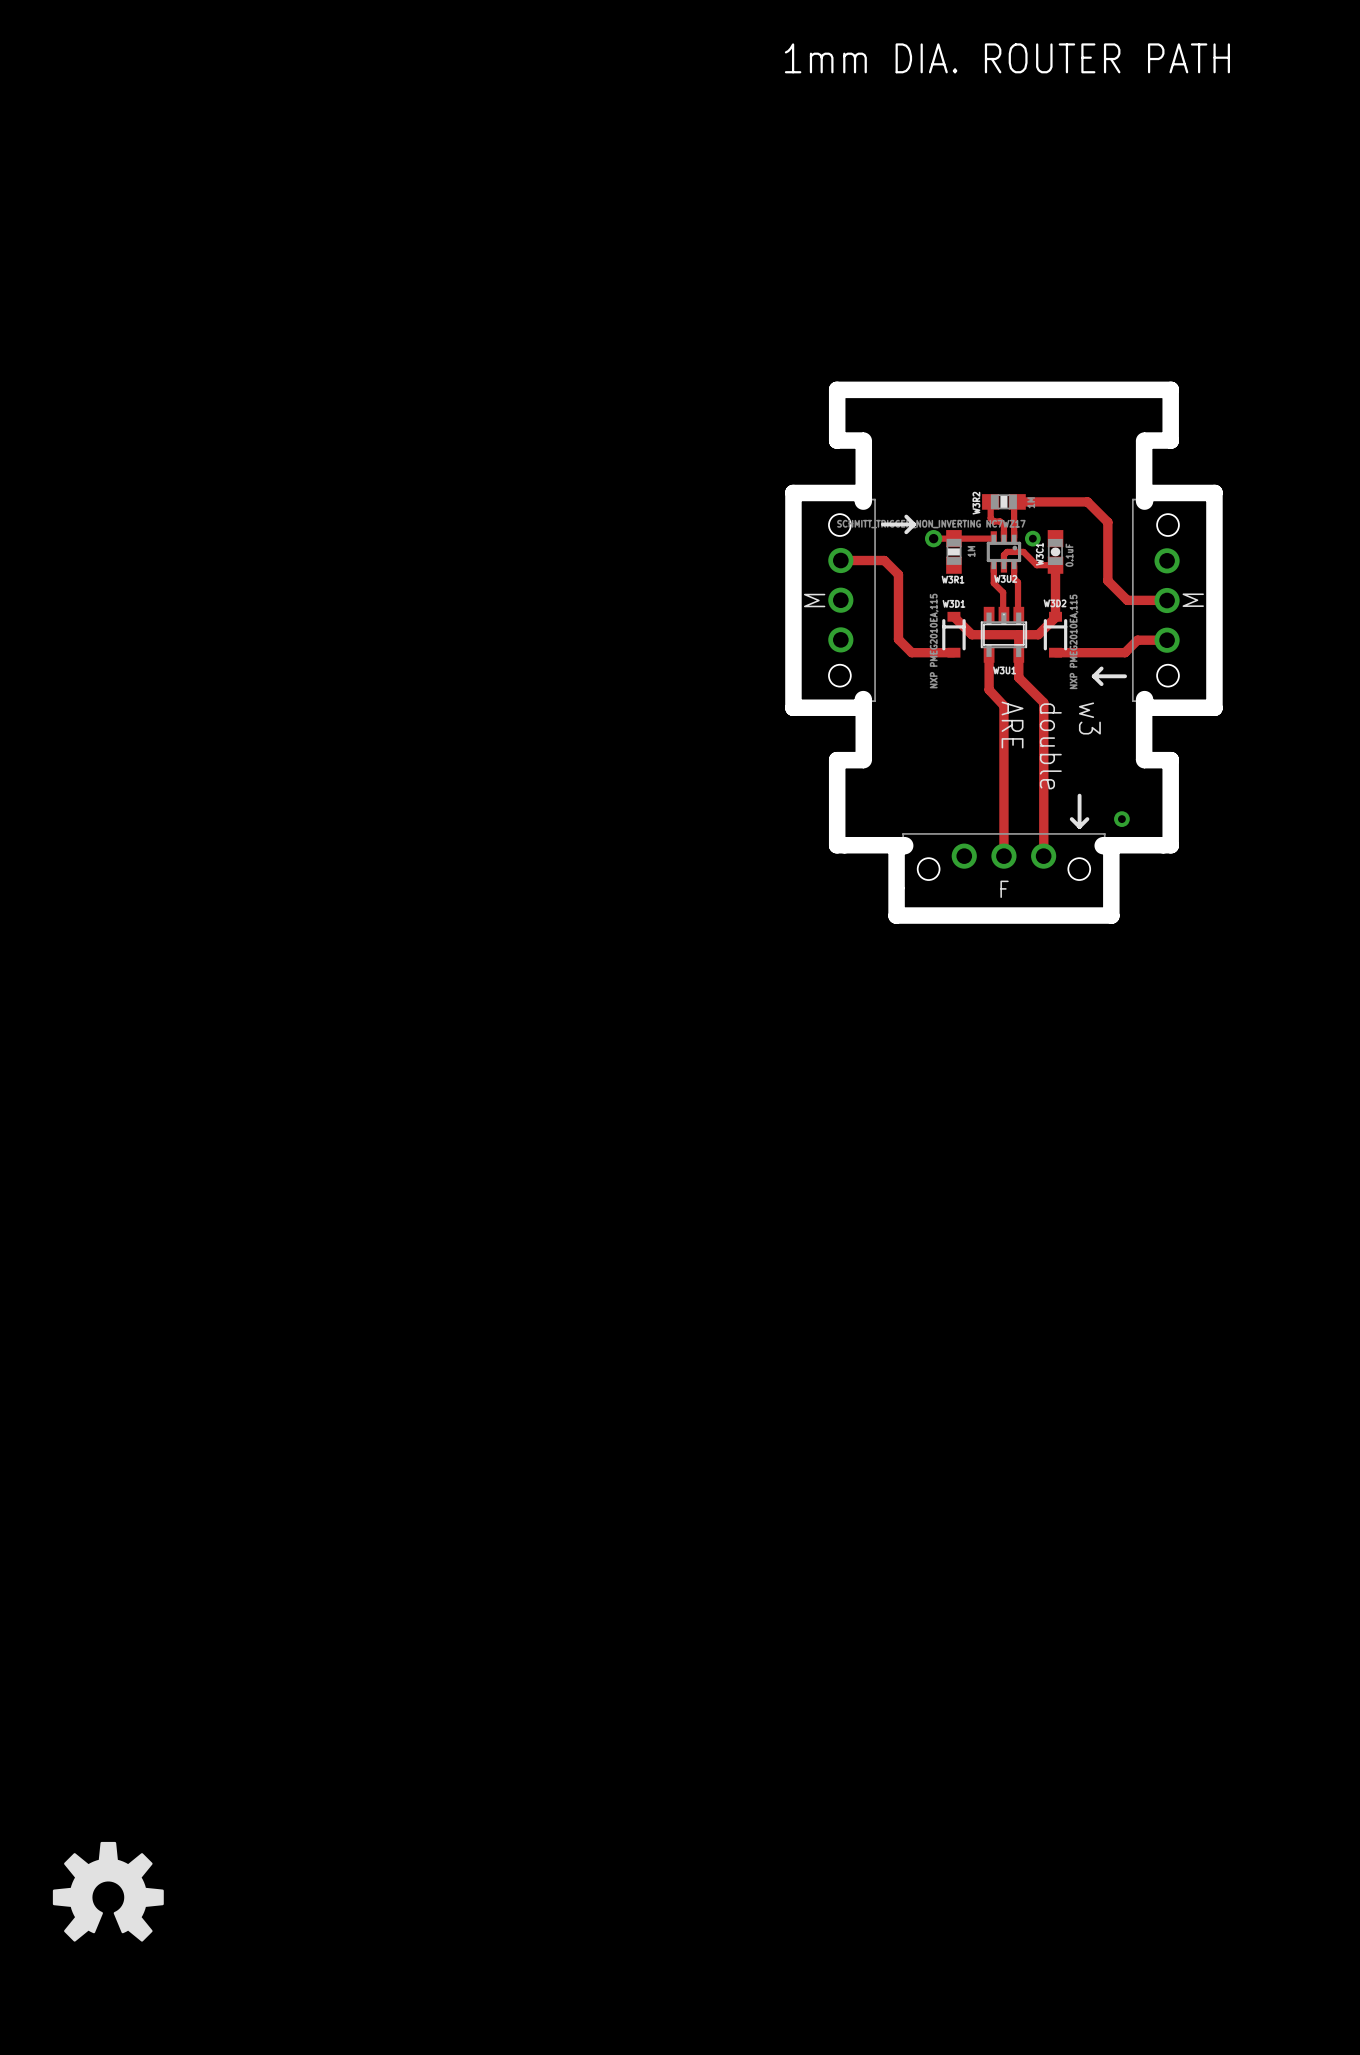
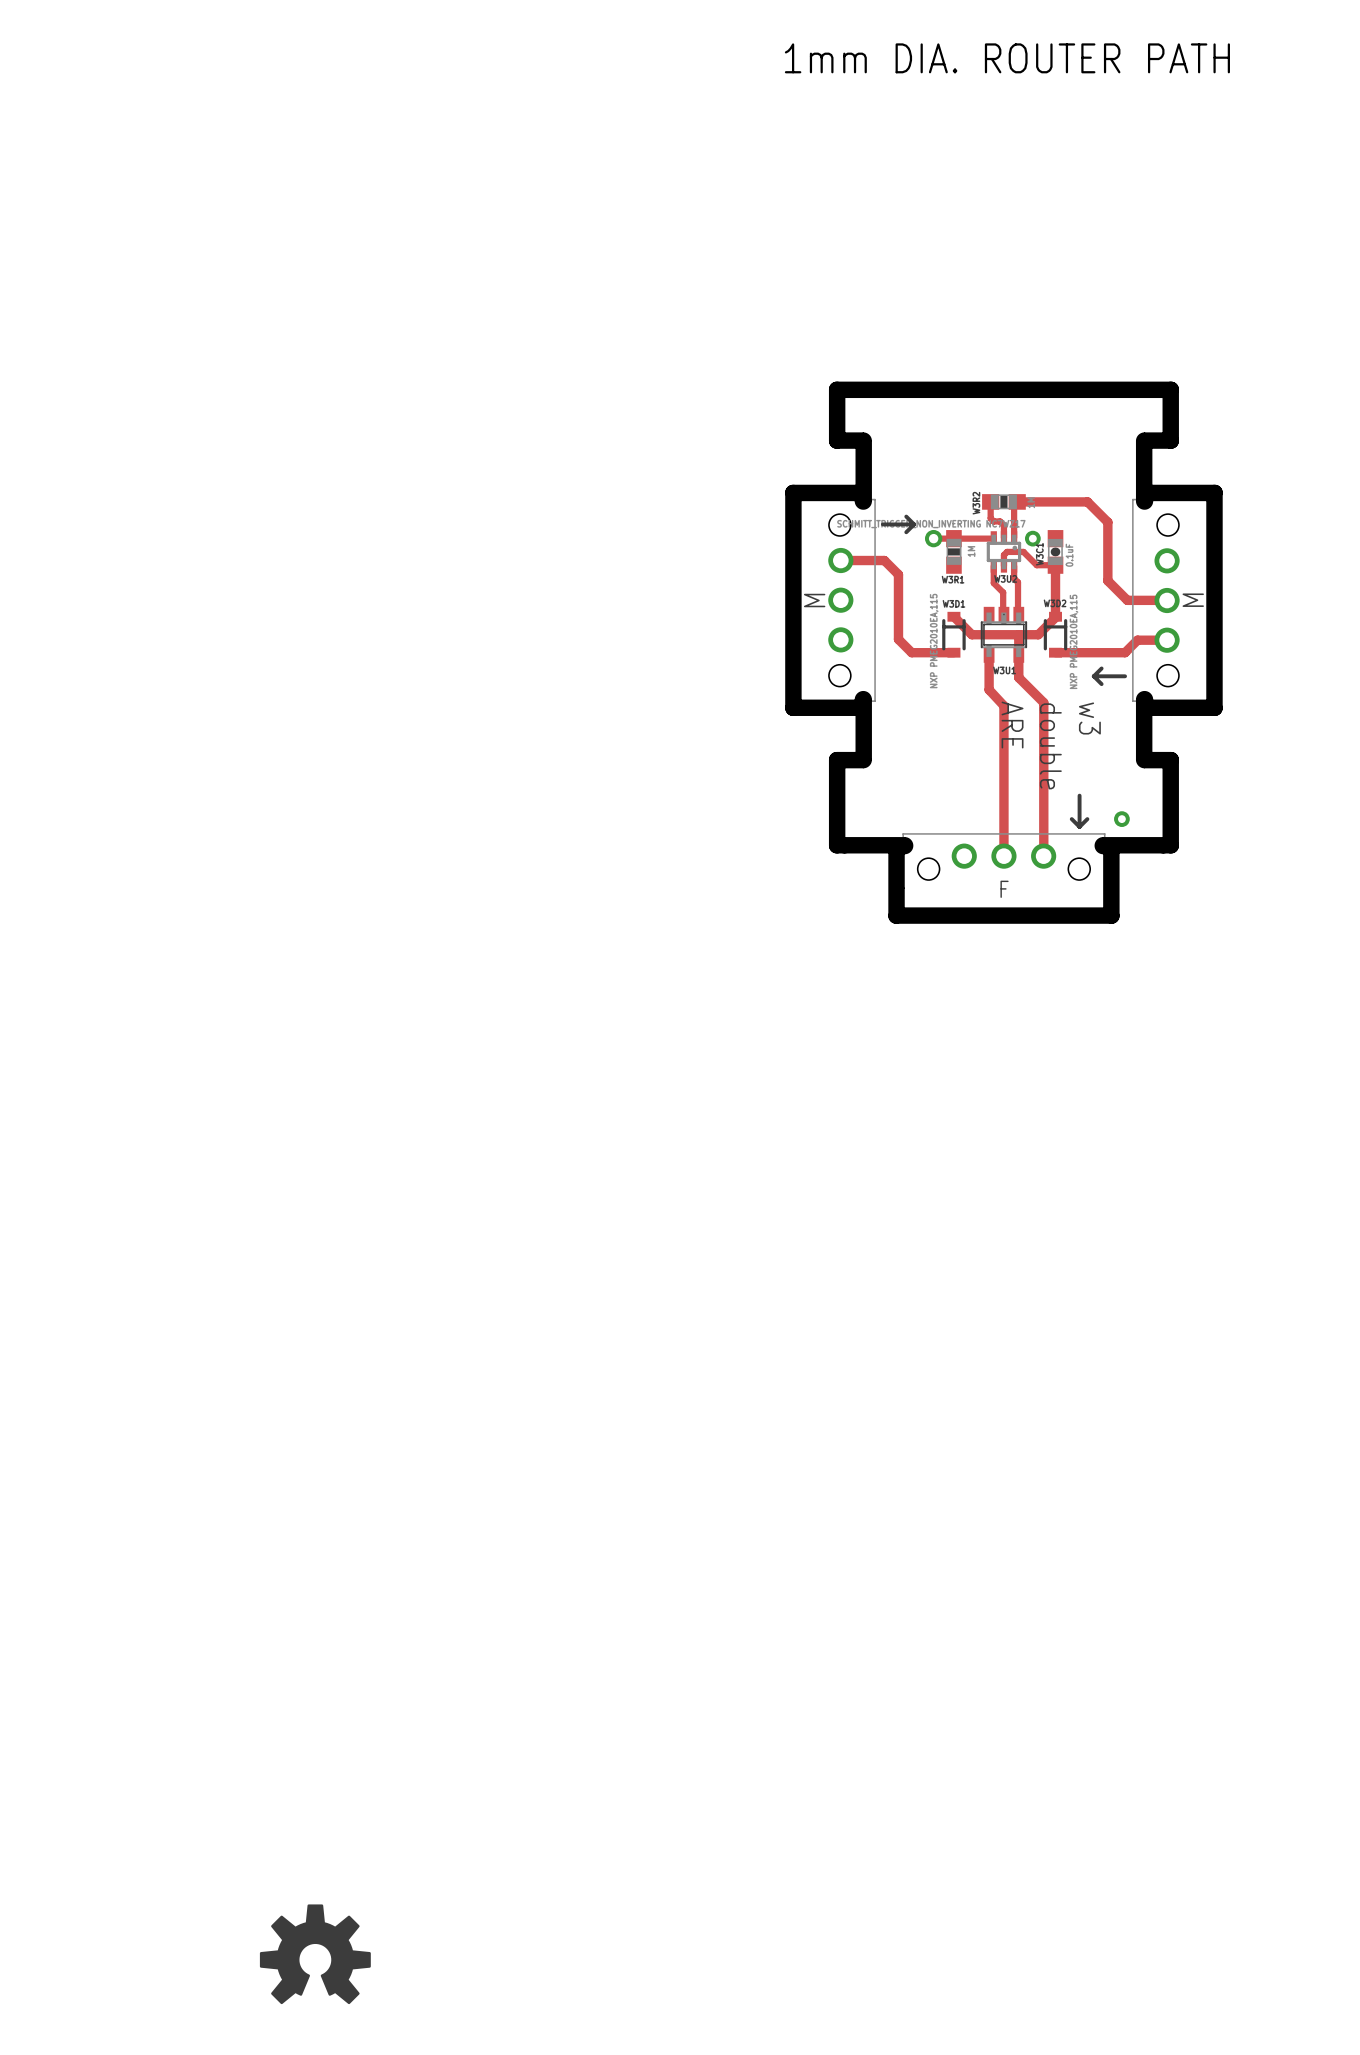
drawing position: (108, 1891) -> (315, 1954)

